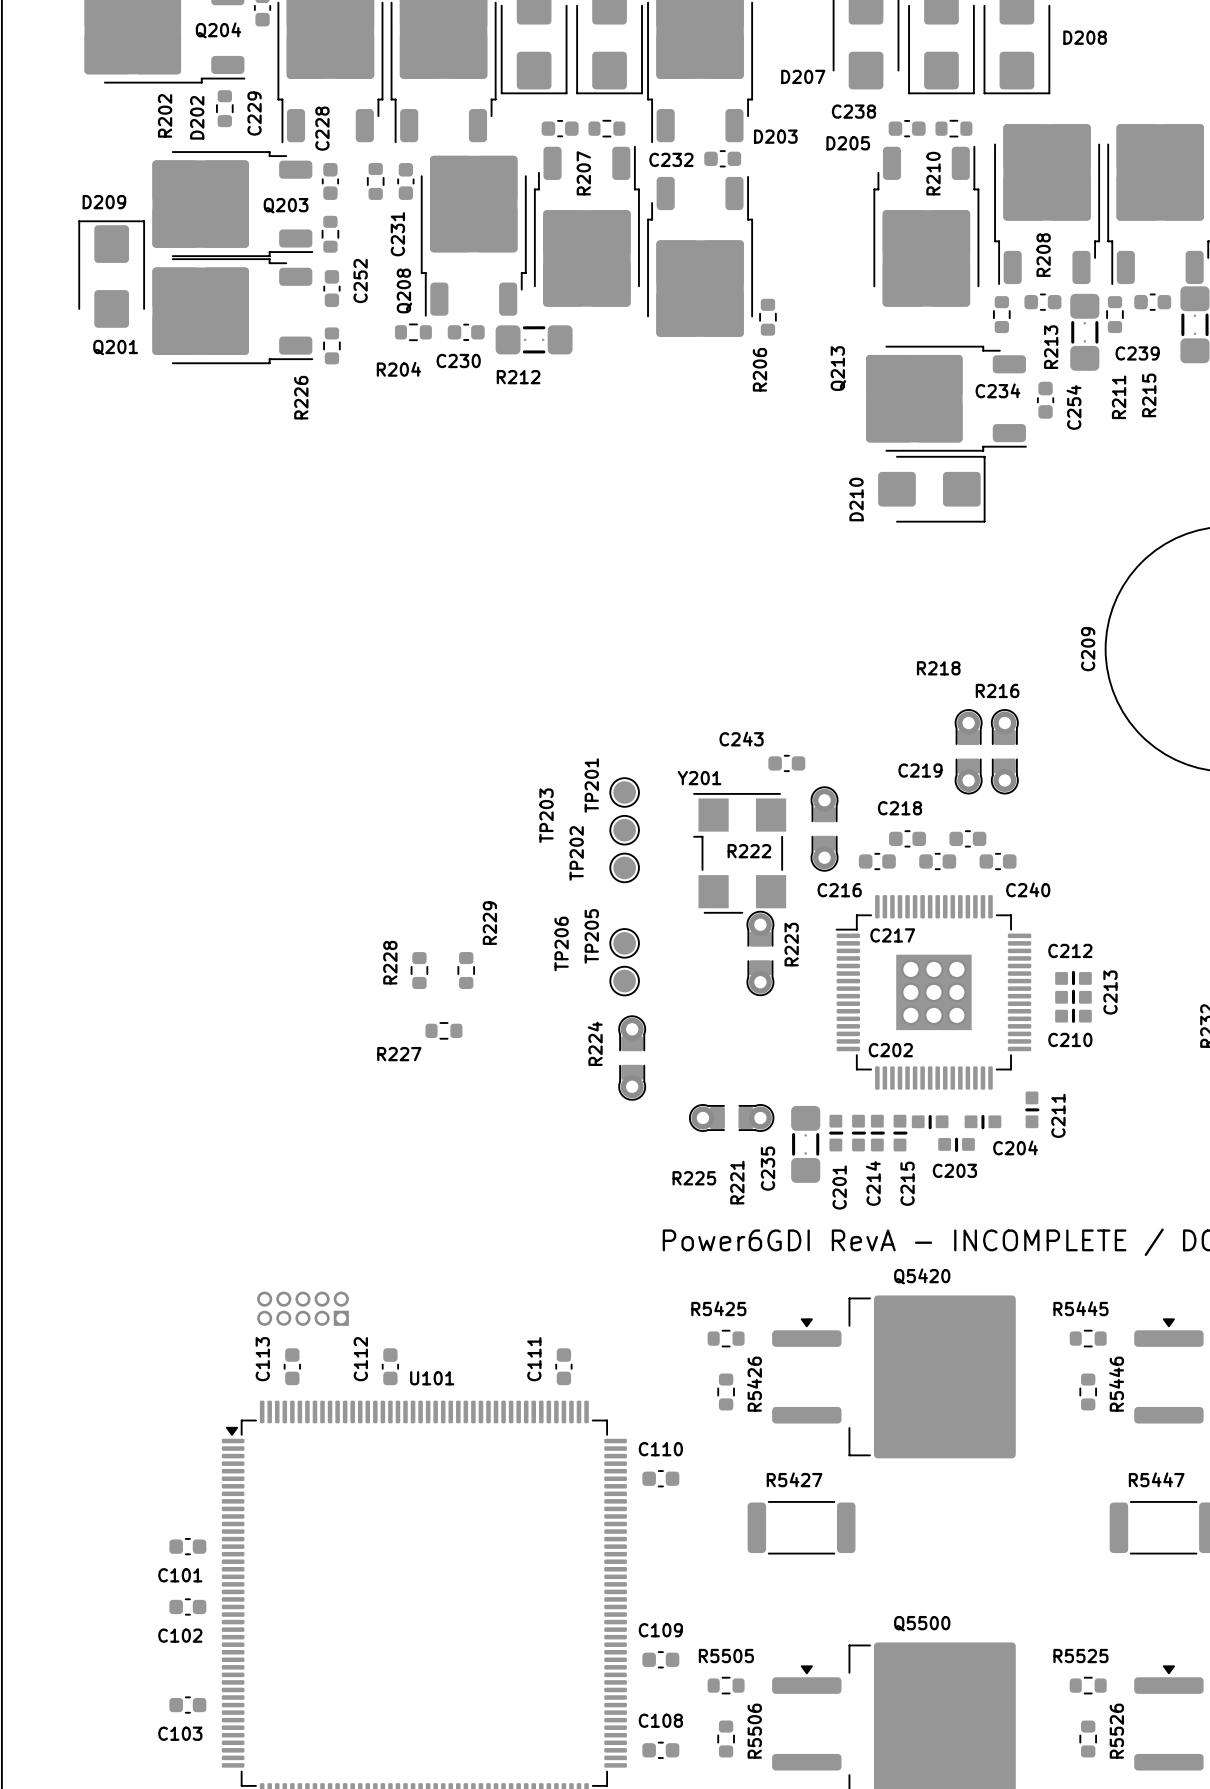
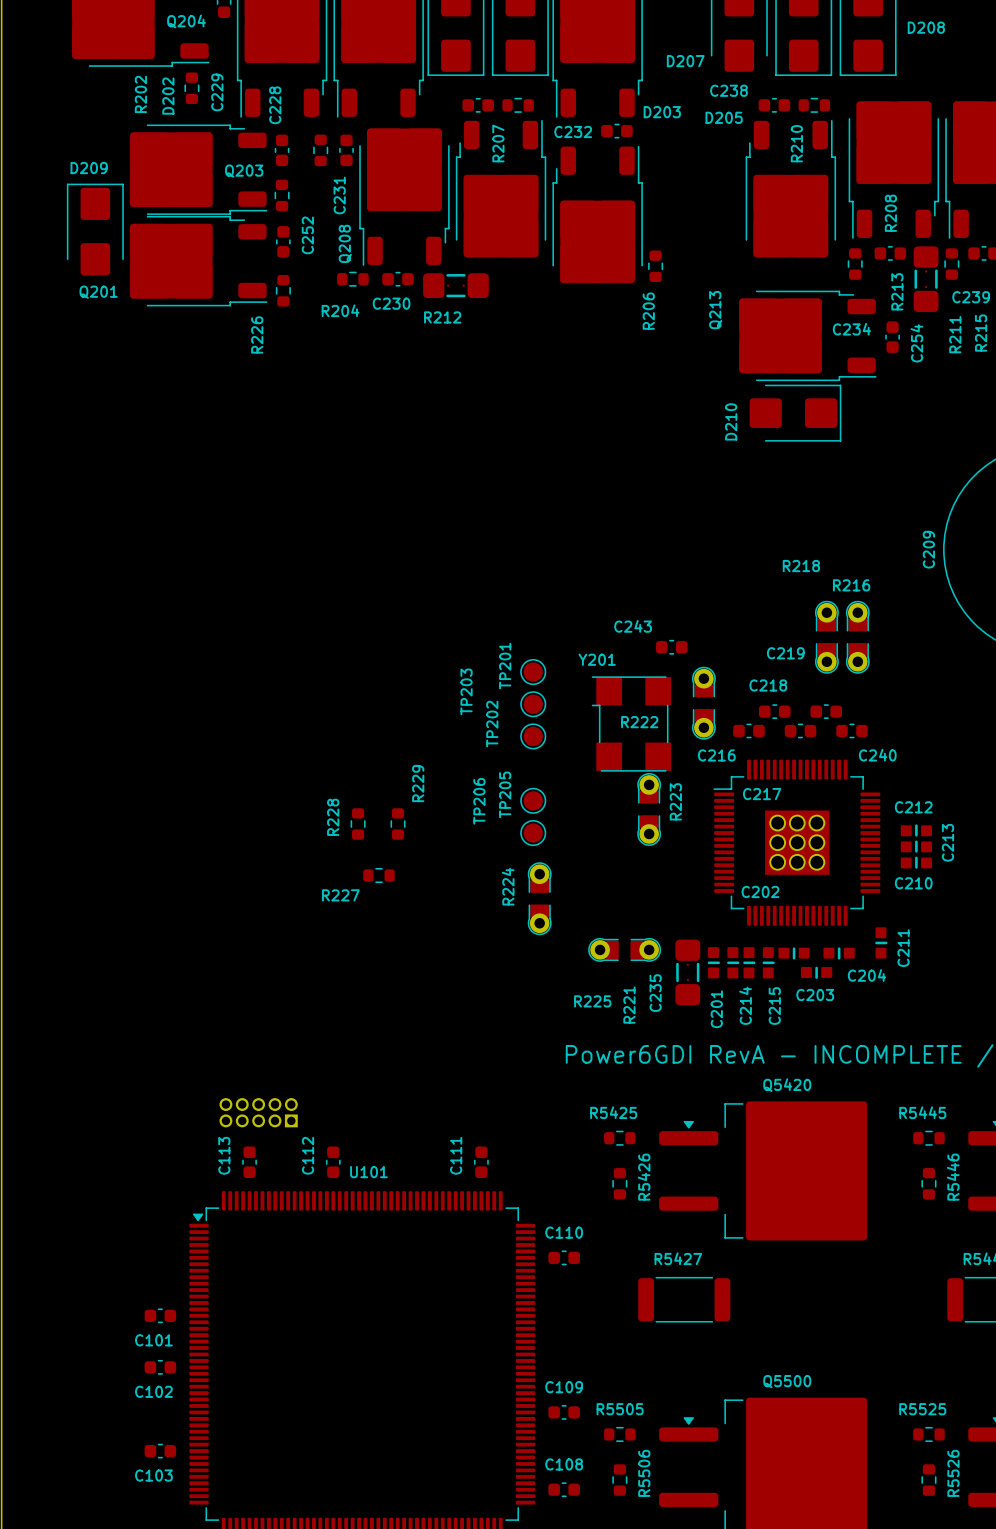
Y201 footprint: [693, 793, 787, 914] -> [591, 676, 672, 772]

